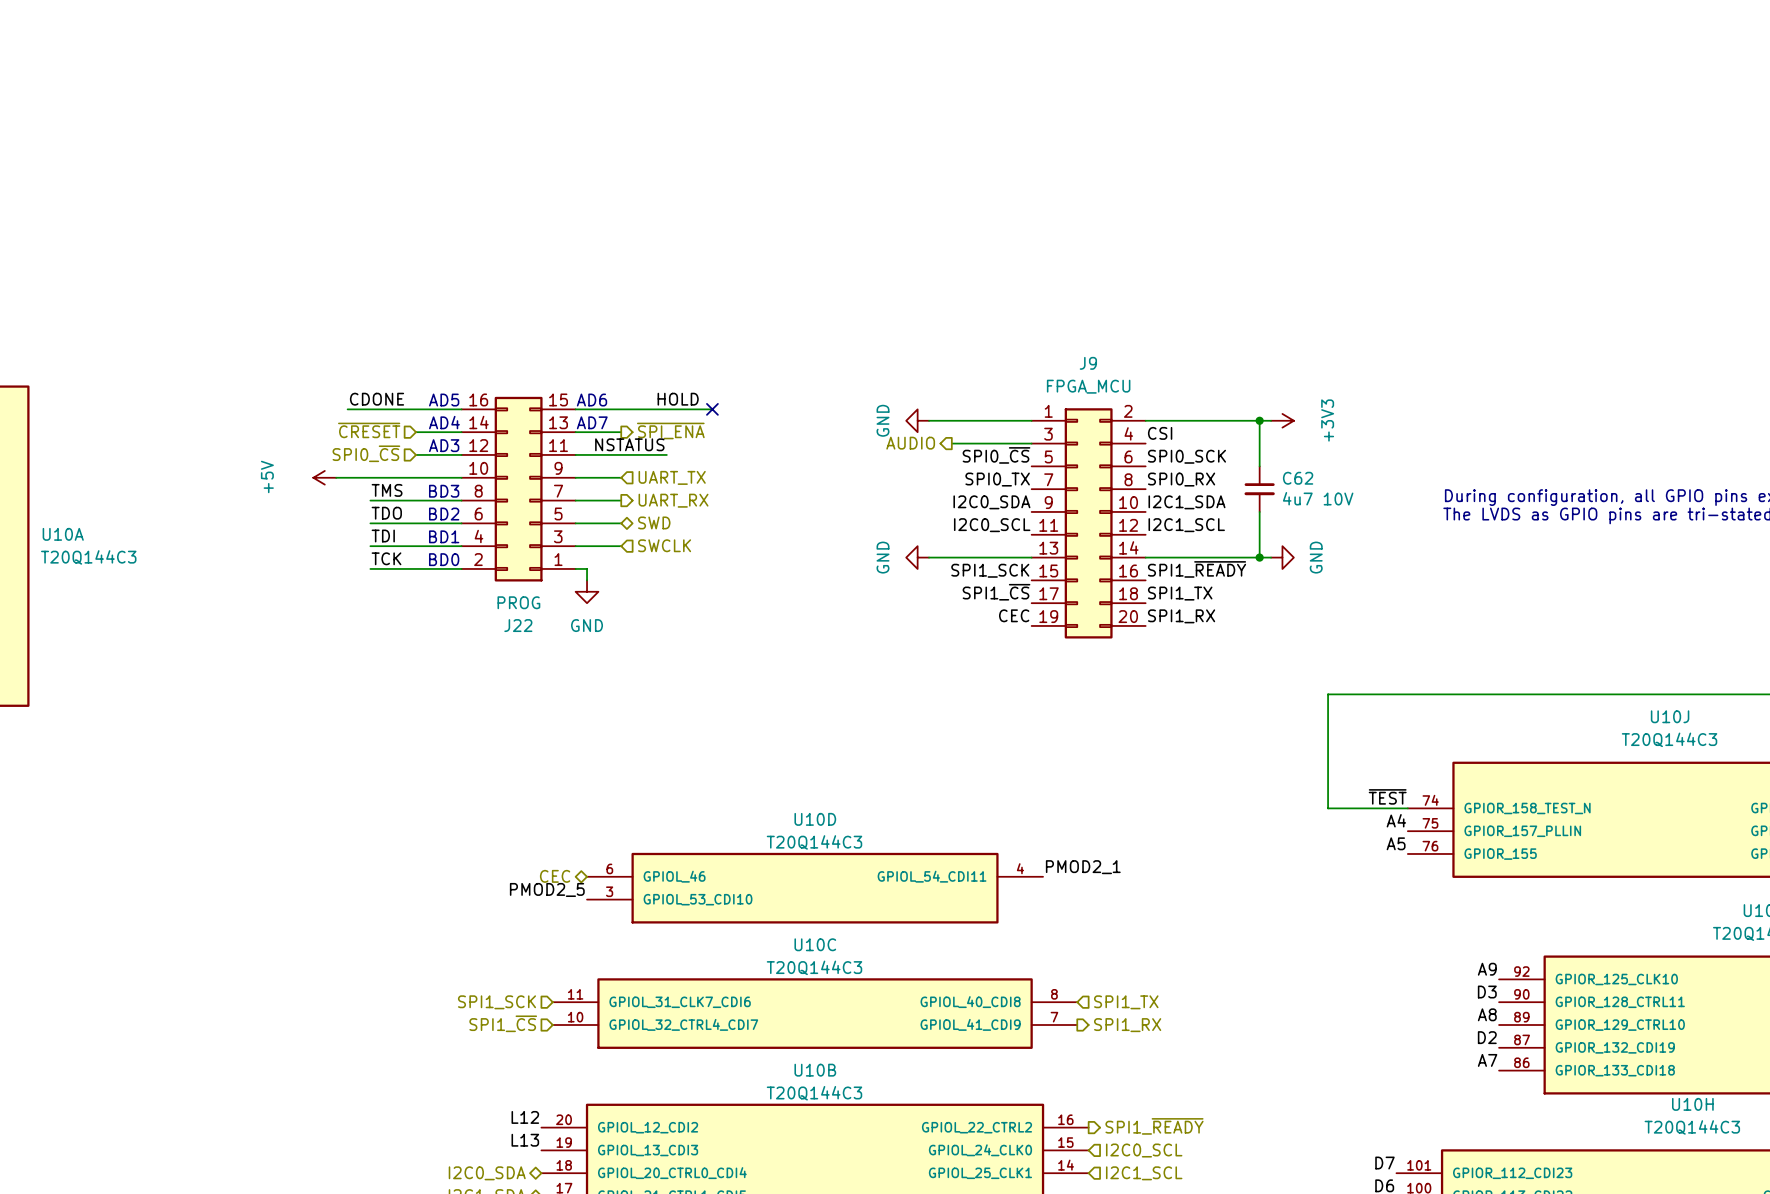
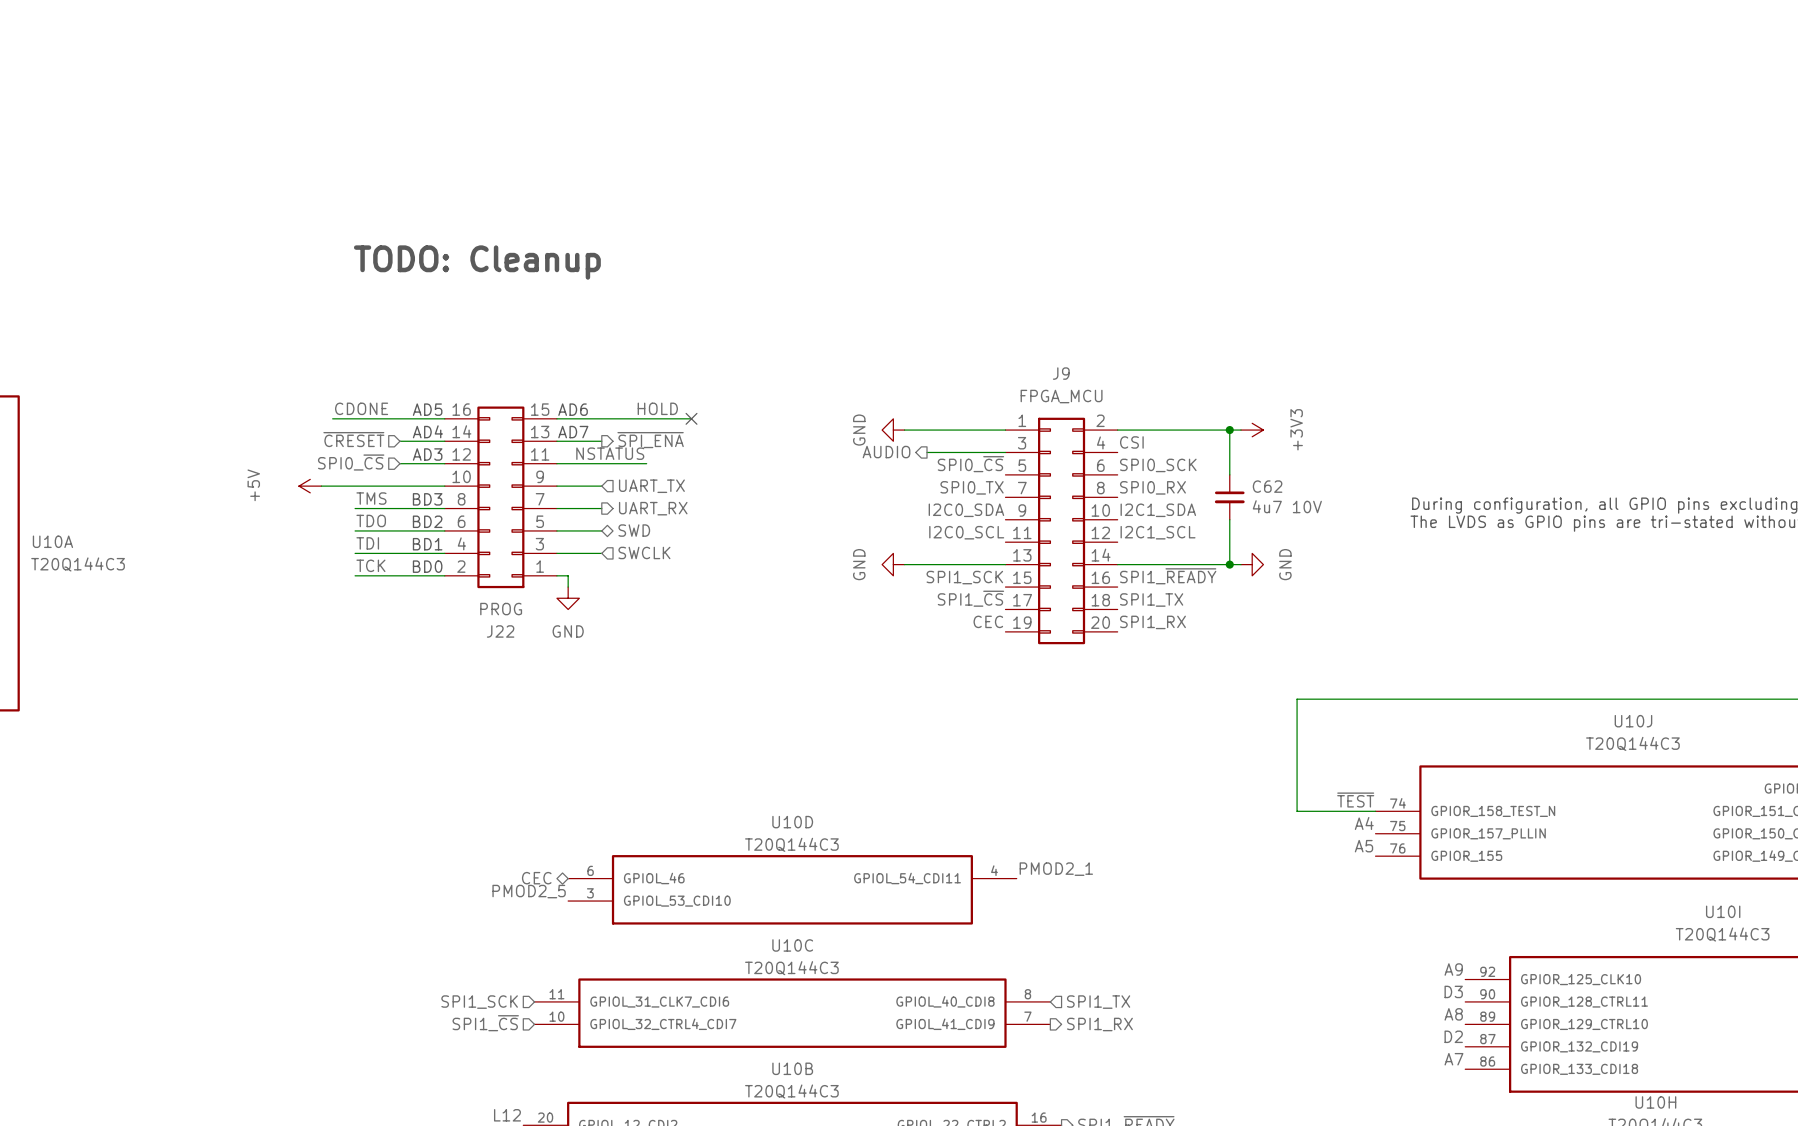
text: none -> TODO: Cleanup (477, 262)

